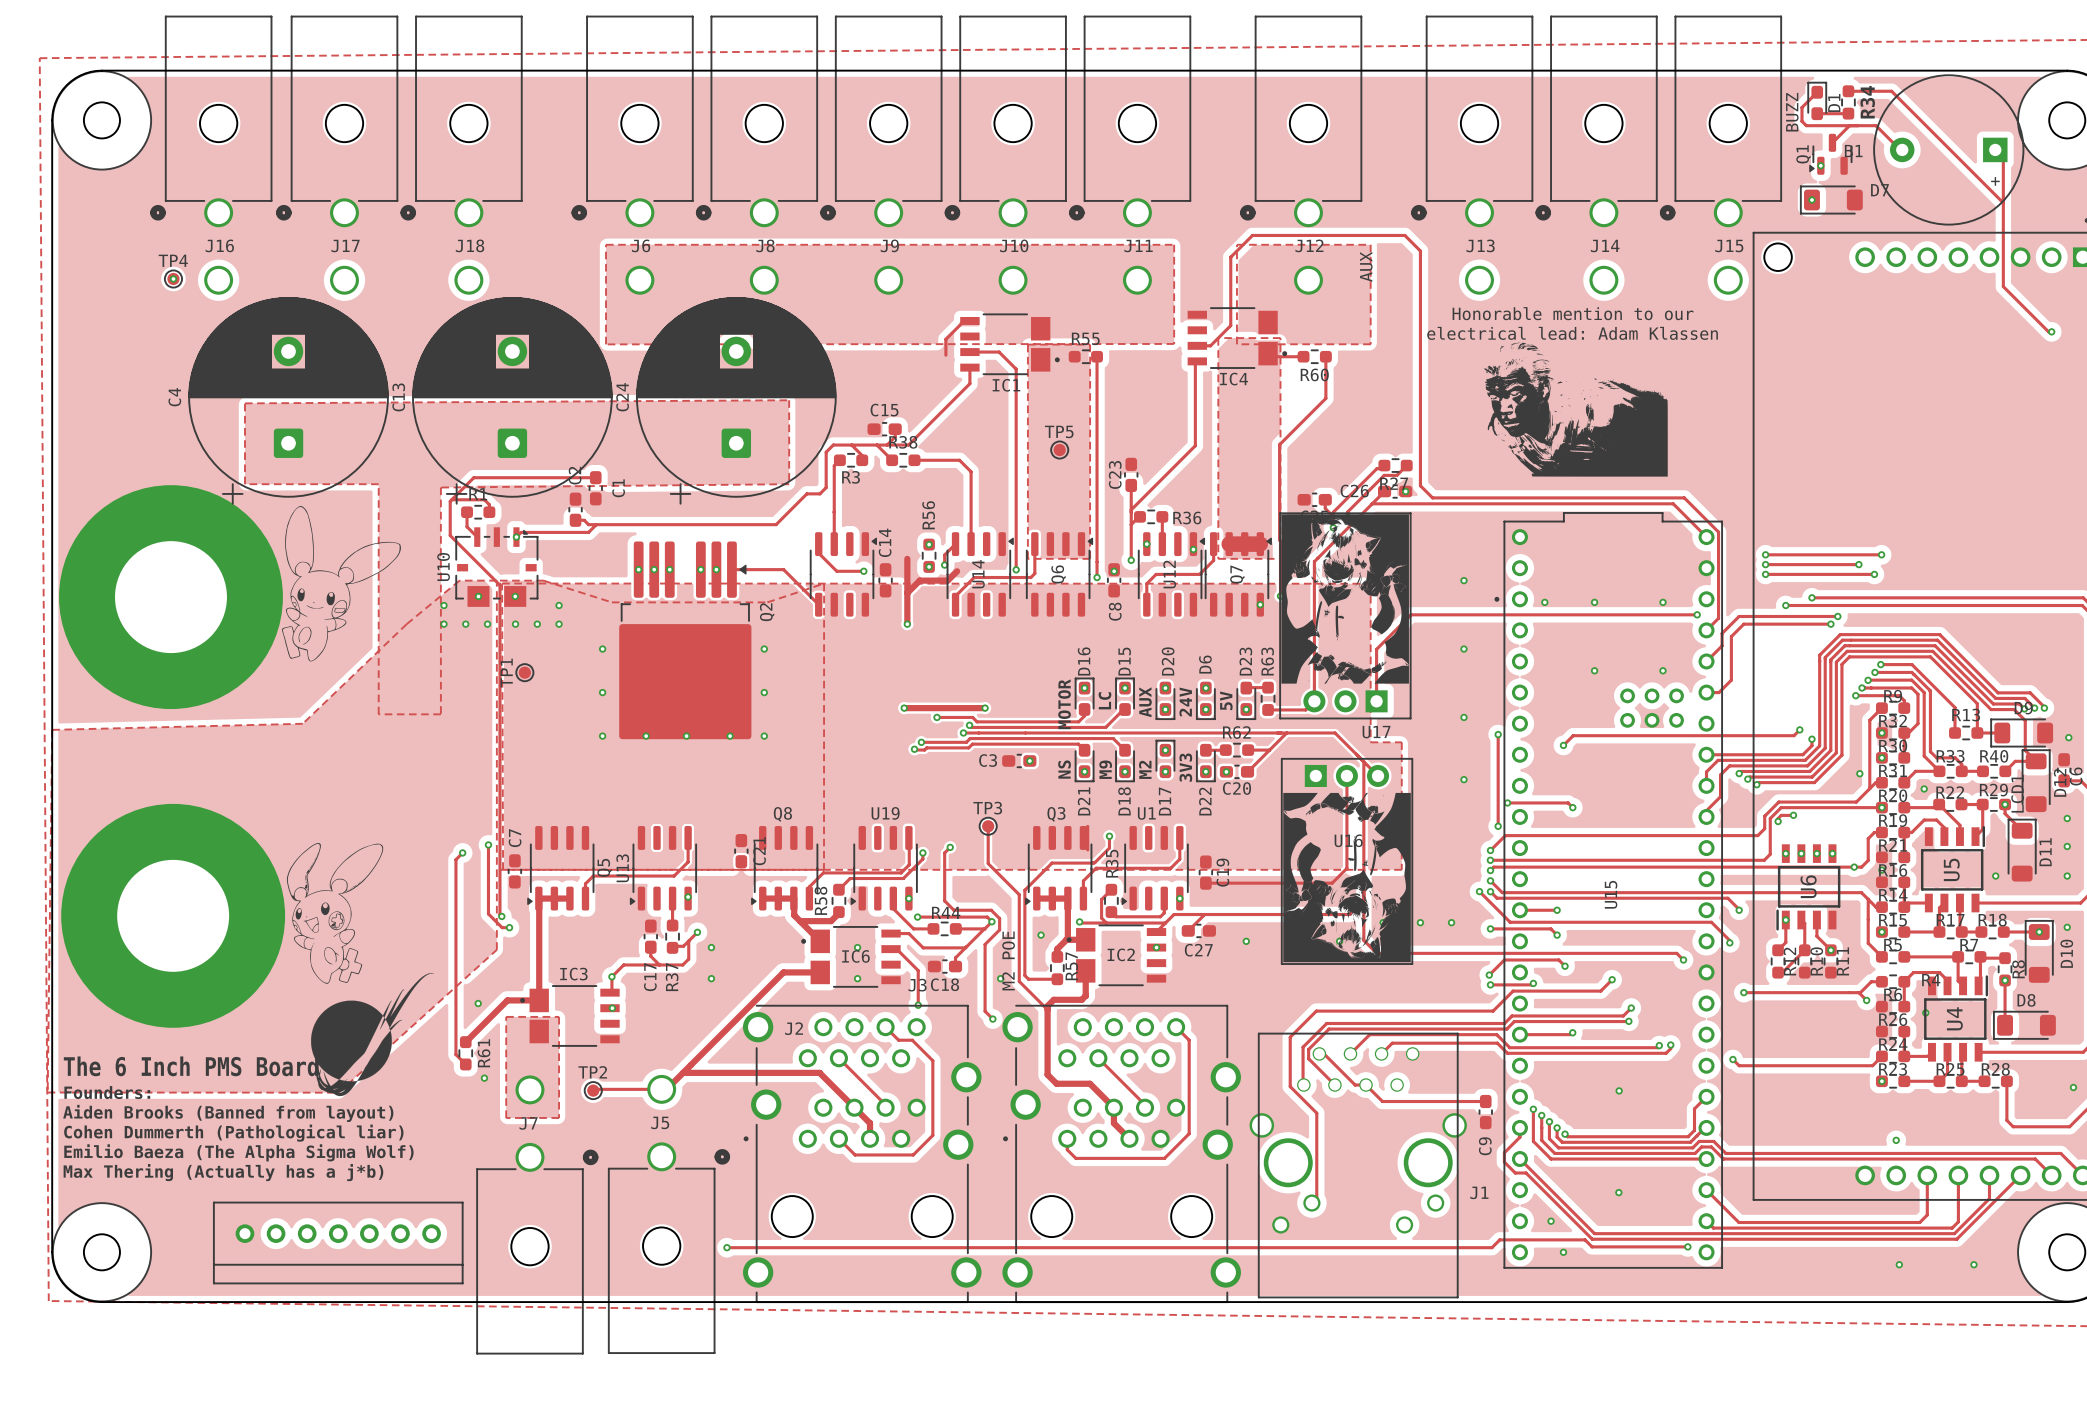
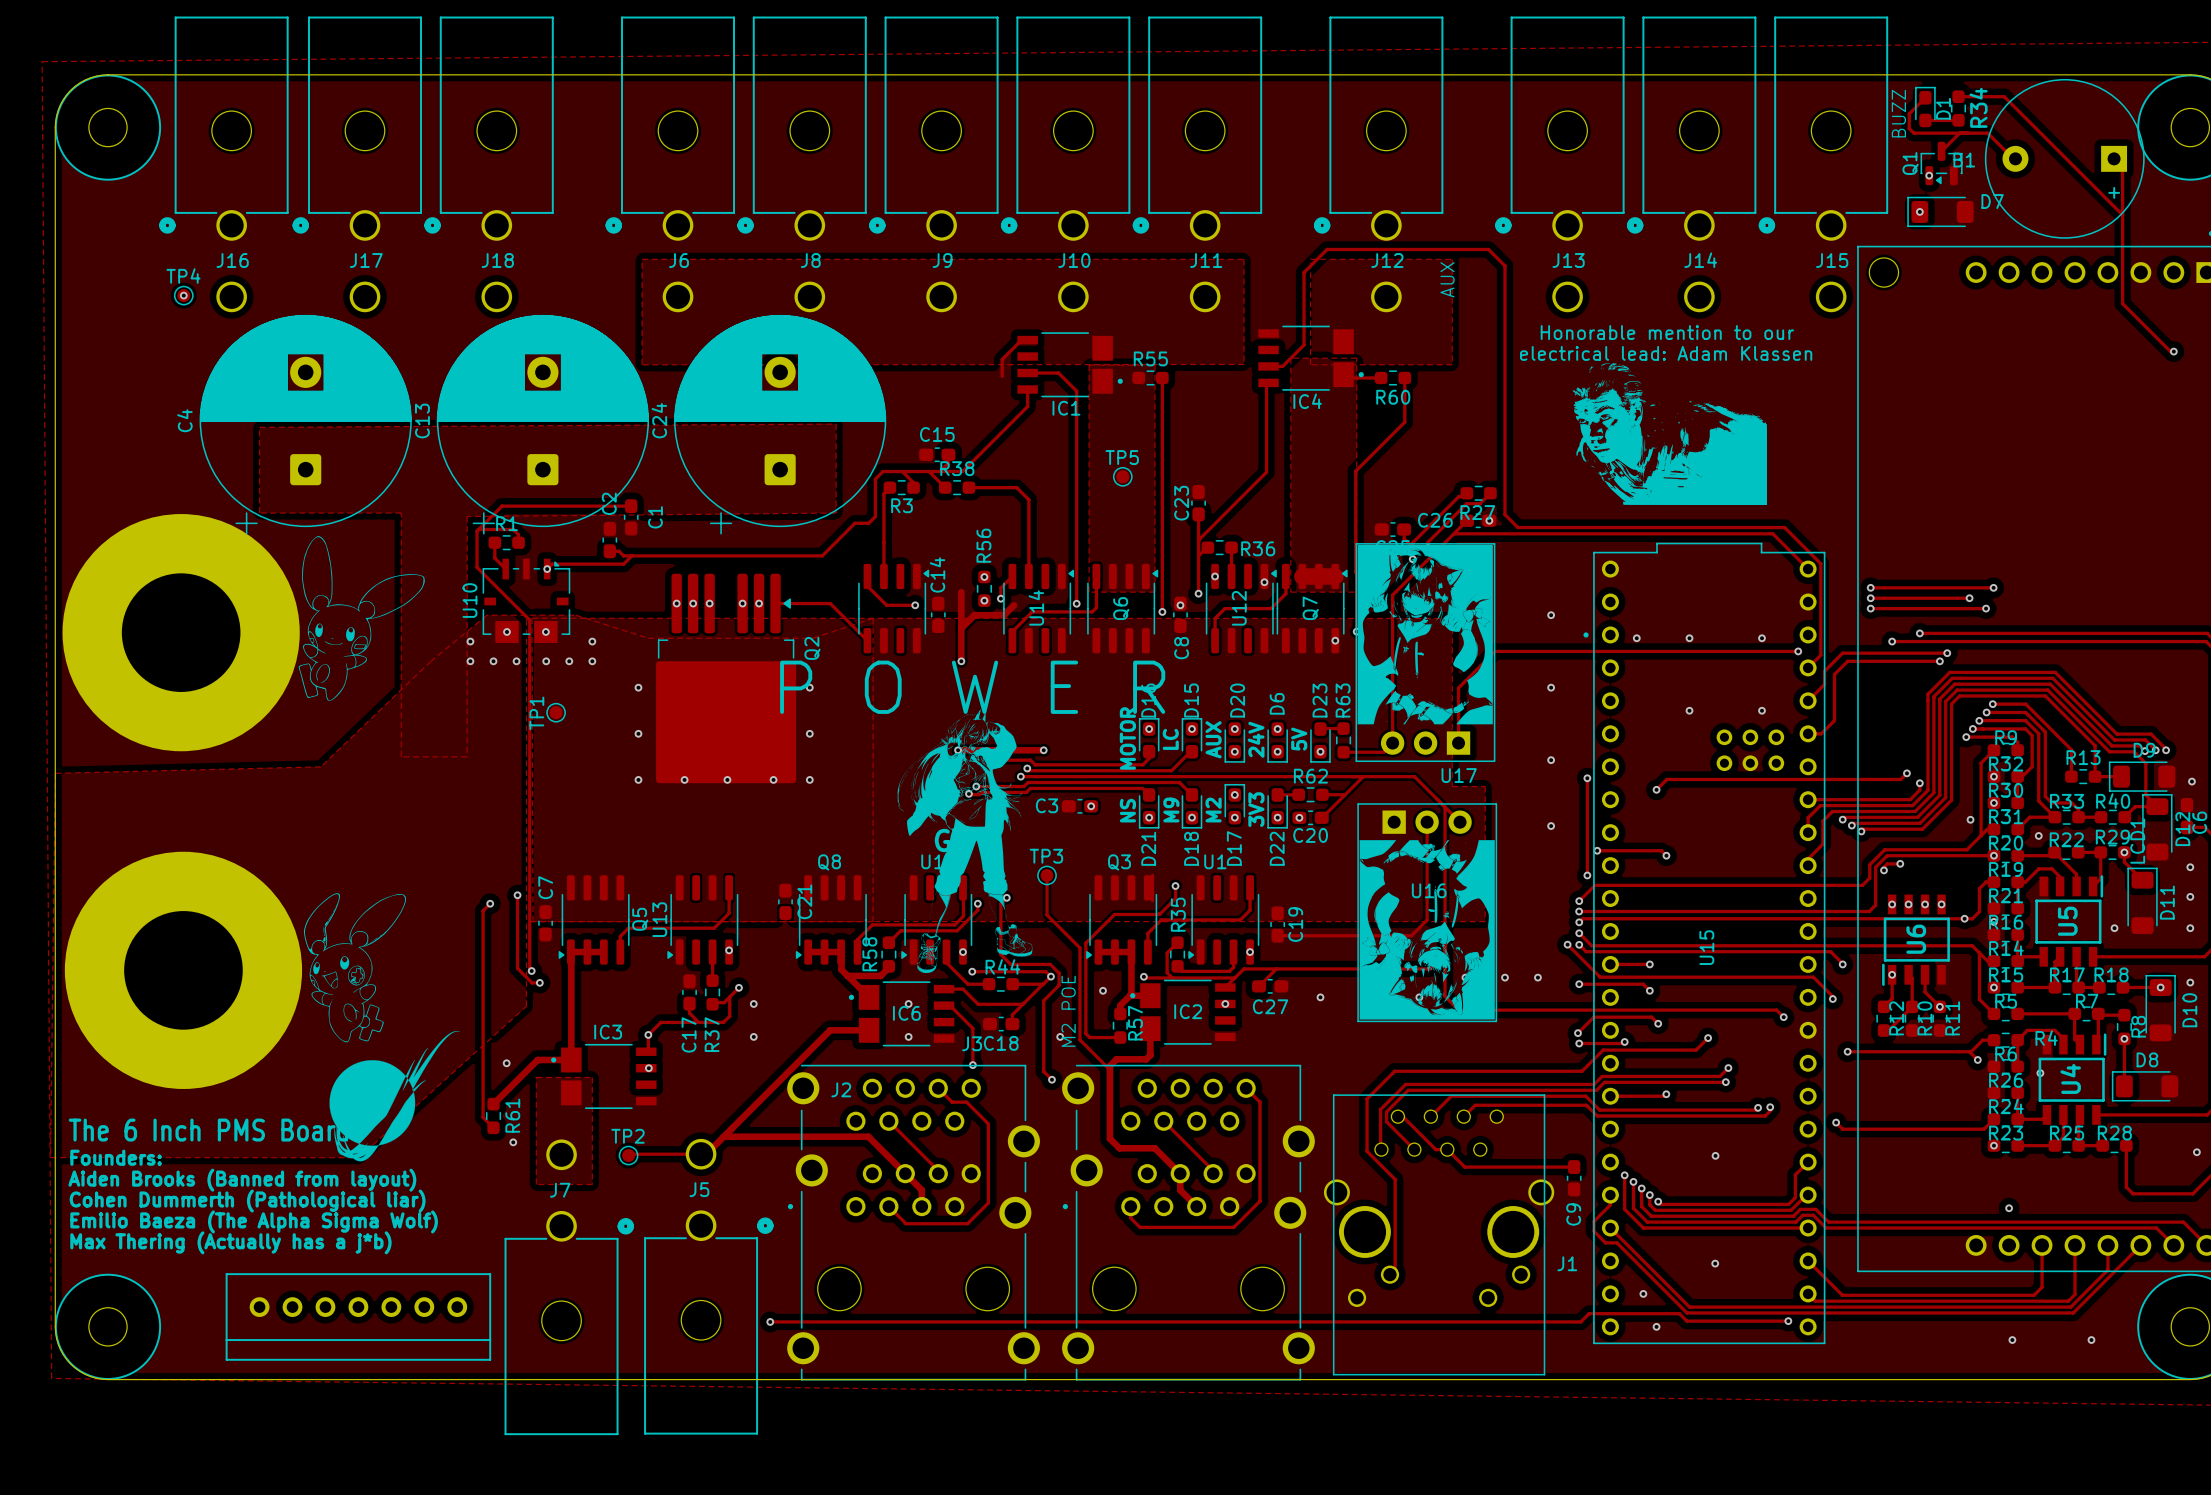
Q1 footprint: [1809, 133, 1853, 175] -> [1920, 141, 1963, 186]
text: none -> P O W E R (972, 687)
part: none -> (964, 841)

